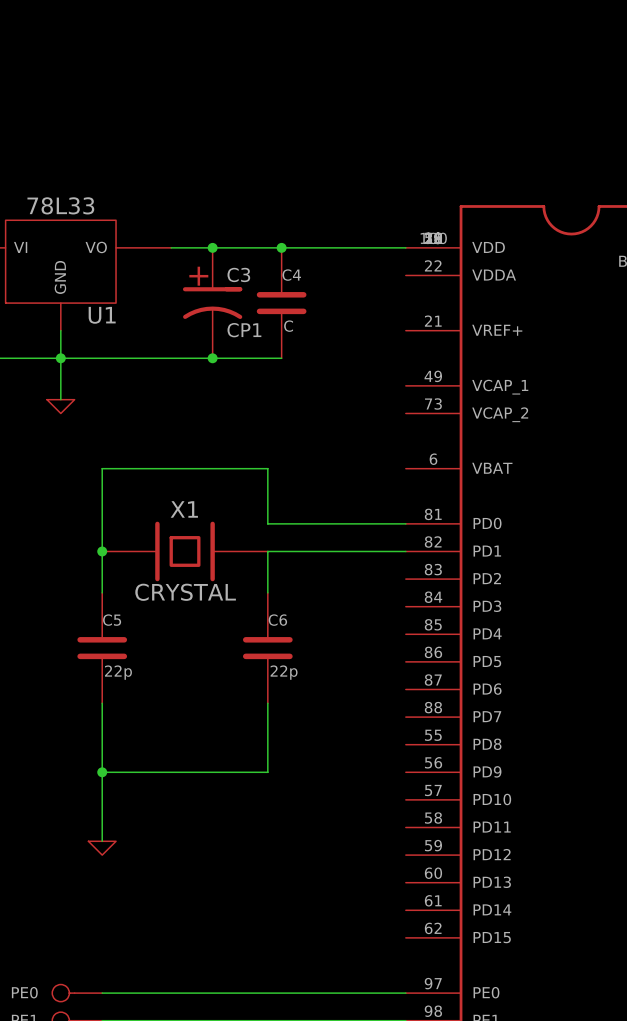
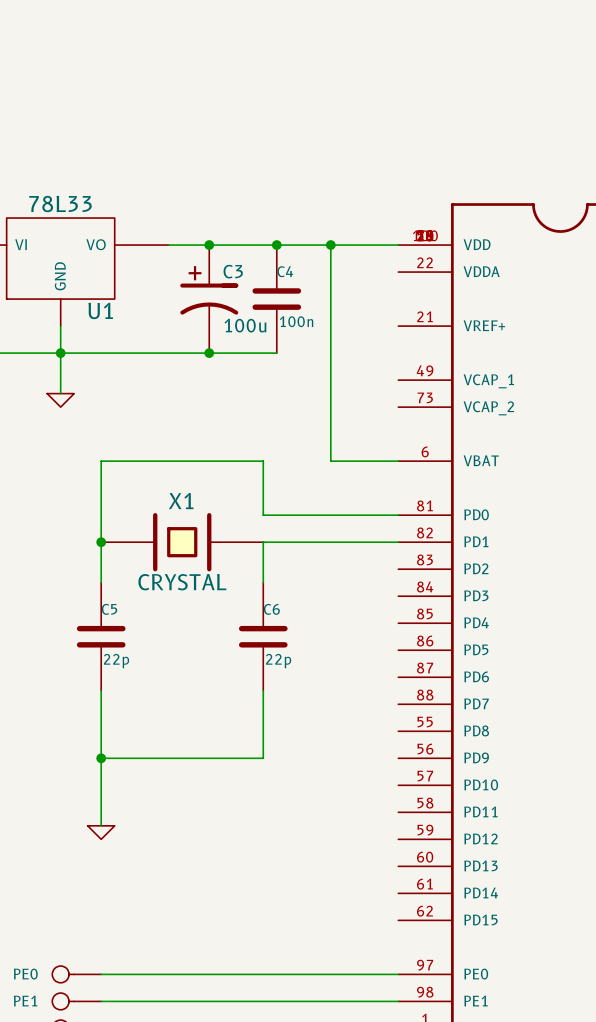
wire: none -> (330, 245) (330, 461) (398, 461)
junction: none -> (330, 245)
C4 value: C (288, 326) -> 100n (296, 321)
C3 value: CP1 (244, 330) -> 100u (245, 325)

